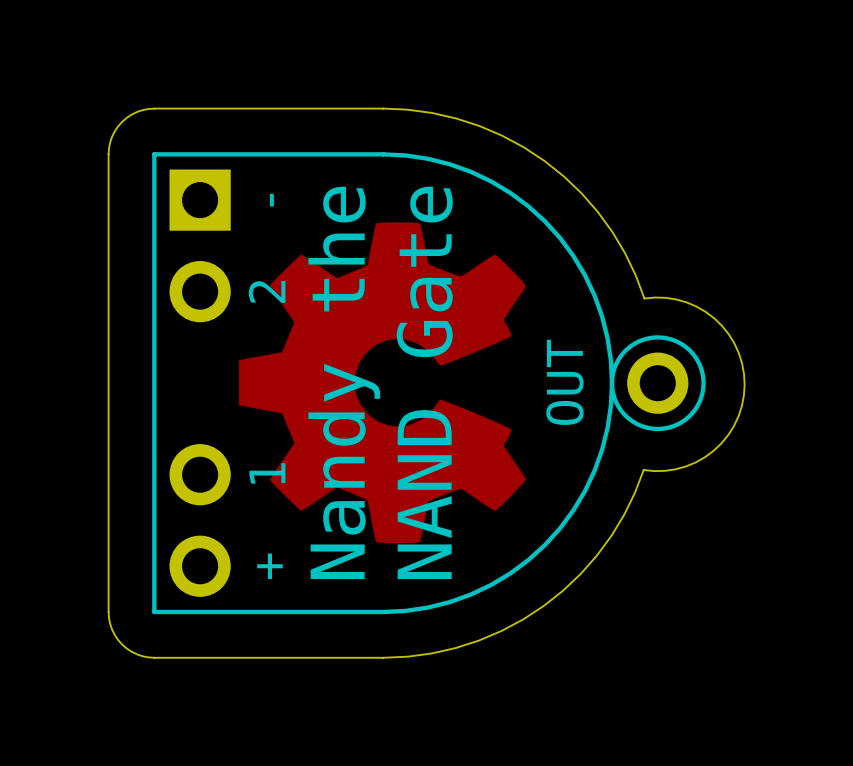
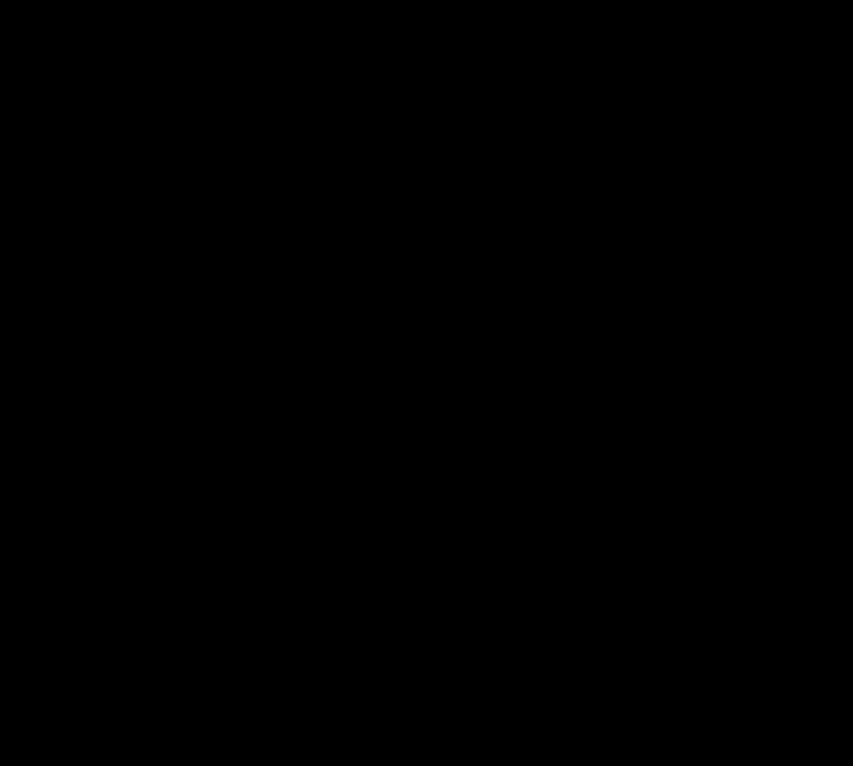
board edge: (154, 108) (407, 109) (456, 118) (479, 126) (524, 147) (563, 176) (597, 212) (625, 253) (644, 298) (676, 299) (696, 306) (714, 318) (728, 334) (738, 353) (744, 373) (743, 395) (734, 425) (721, 443) (695, 462) (665, 470) (643, 470) (624, 514) (611, 535) (580, 573) (562, 590) (523, 619) (479, 640) (431, 653) (383, 657) (154, 657) (142, 656) (131, 651) (121, 644) (114, 634) (110, 623) (108, 612) (108, 154) (112, 136) (121, 121) (136, 112) (154, 108) -> none
line: (154, 154) (383, 154) (427, 158) (449, 164) (491, 181) (528, 206) (544, 221) (573, 256) (594, 295) (607, 338) (612, 383) (607, 427) (594, 470) (573, 510) (544, 544) (510, 573) (491, 585) (449, 602) (427, 607) (383, 612) (154, 612) (154, 154) -> none
text: - (271, 200) -> none
drawing: [238, 222, 527, 544] -> none
part: (200, 245) -> none
text: 2 (267, 291) -> none
drawing: [609, 335, 706, 432] -> none
text: Nandy the (344, 382) -> none
text: NAND Gate (424, 382) -> none
text: OUT (564, 382) -> none
part: (657, 383) -> none
text: 1 (267, 473) -> none
part: (200, 520) -> none
text: + (269, 566) -> none

